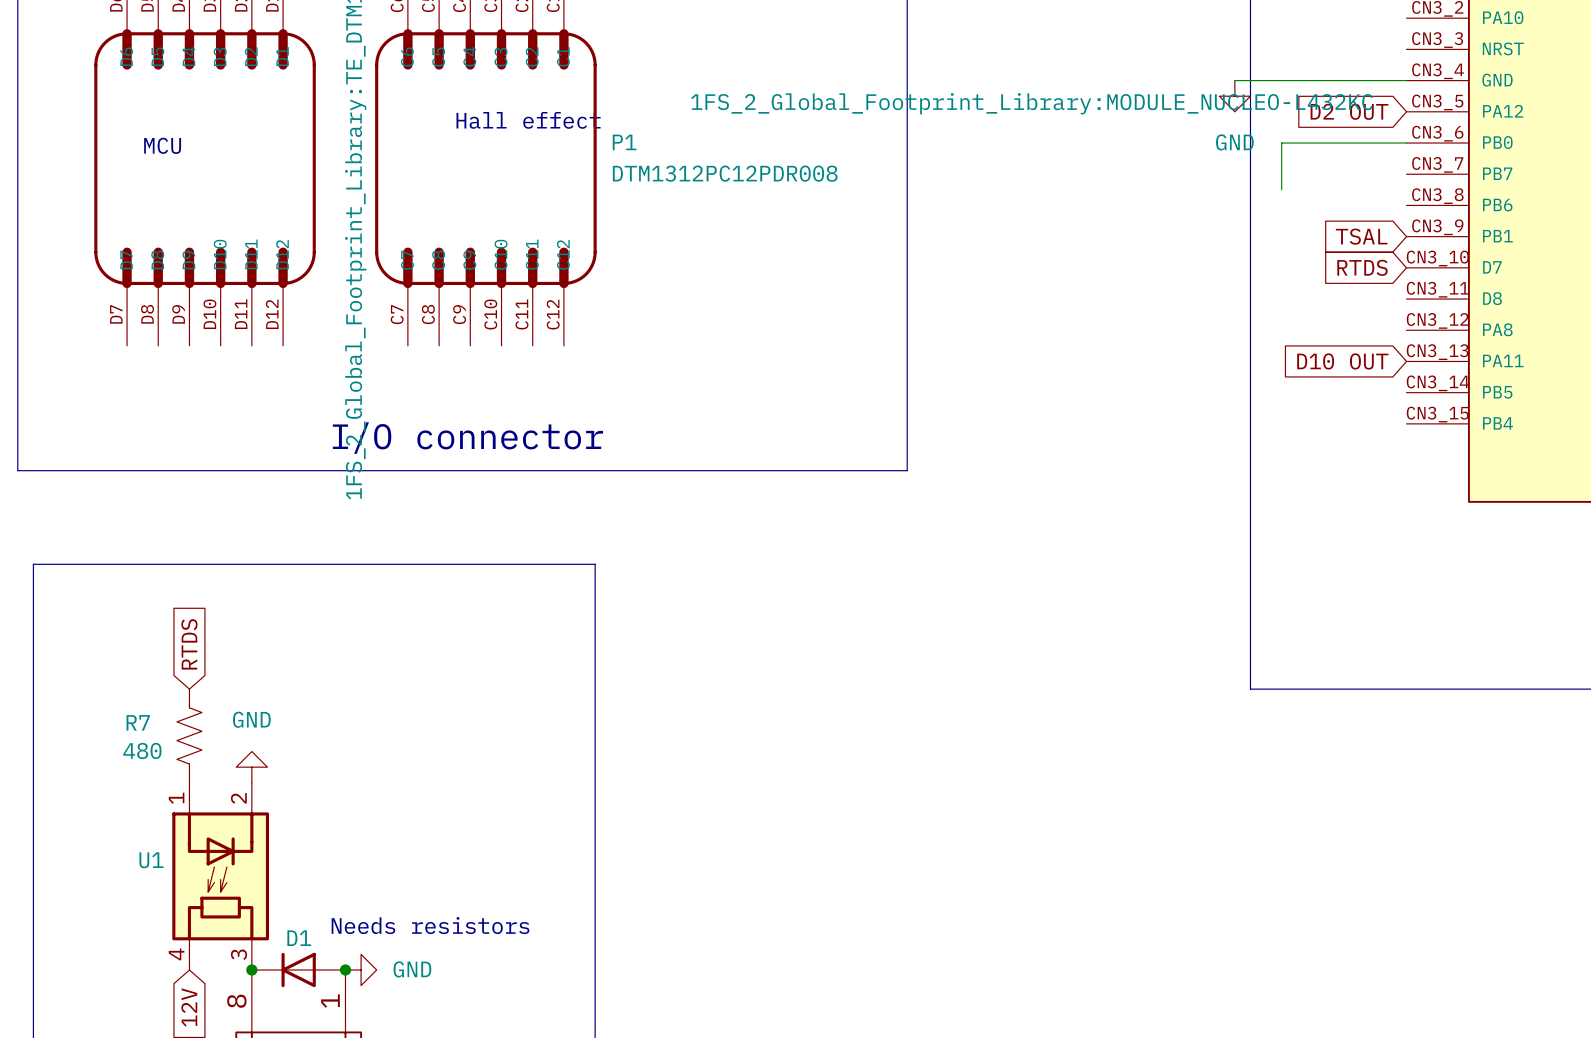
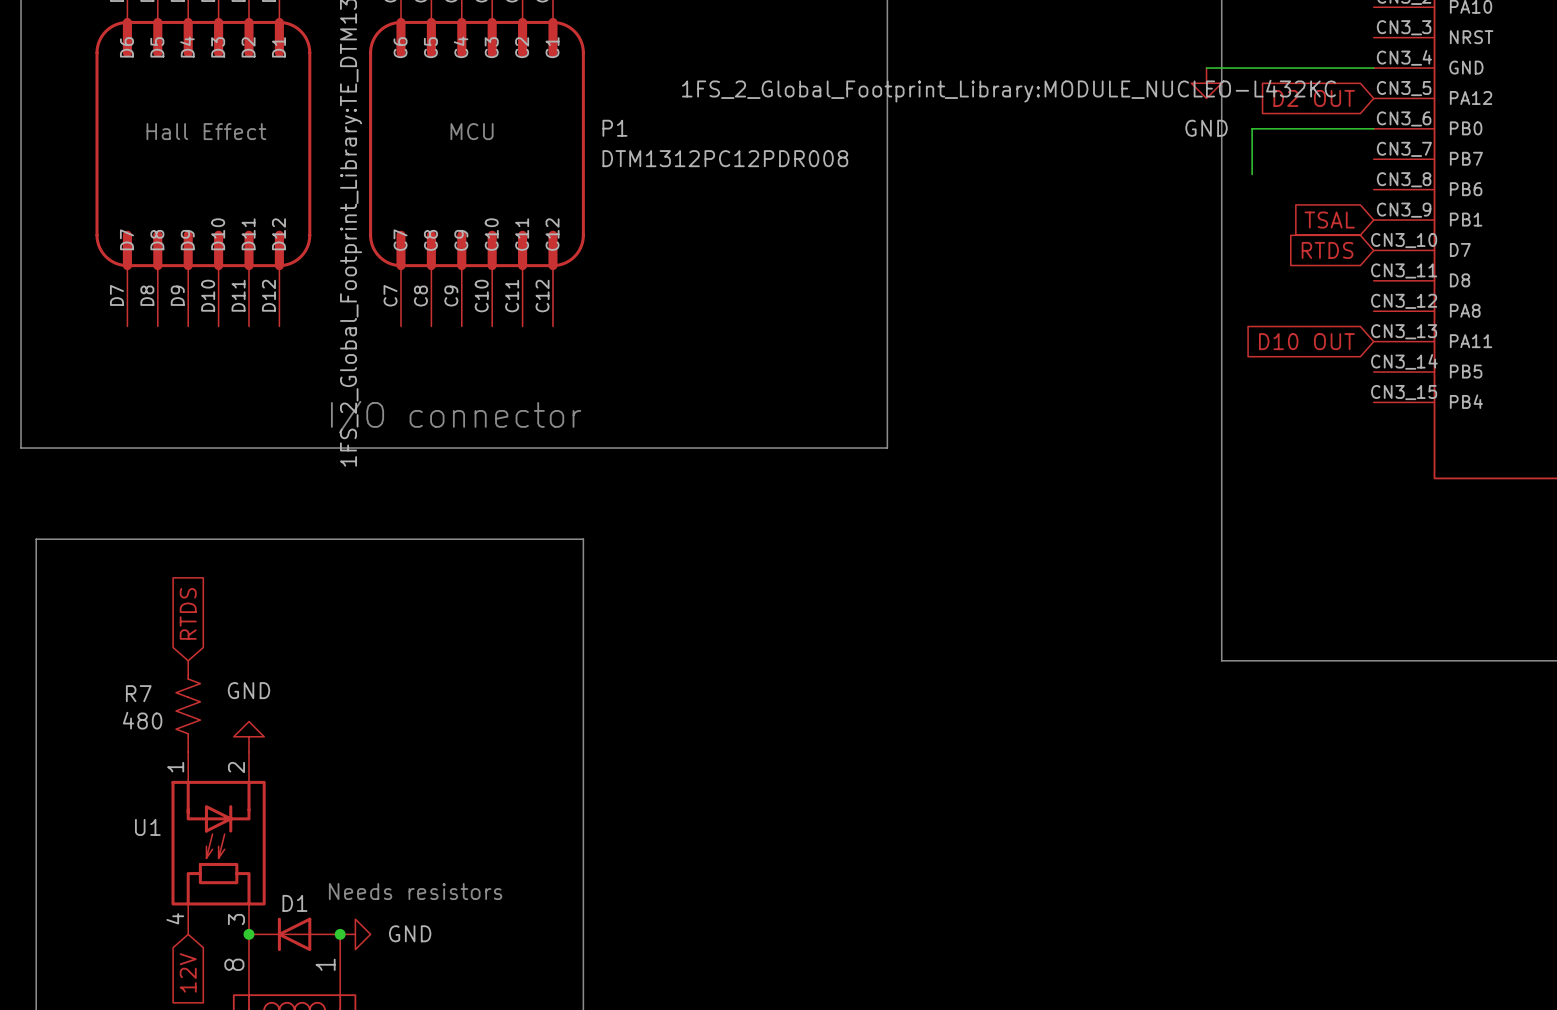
text: Hall effect (528, 120) -> none
text: MCU (162, 145) -> Hall Effect (206, 131)
text: none -> MCU (472, 131)

